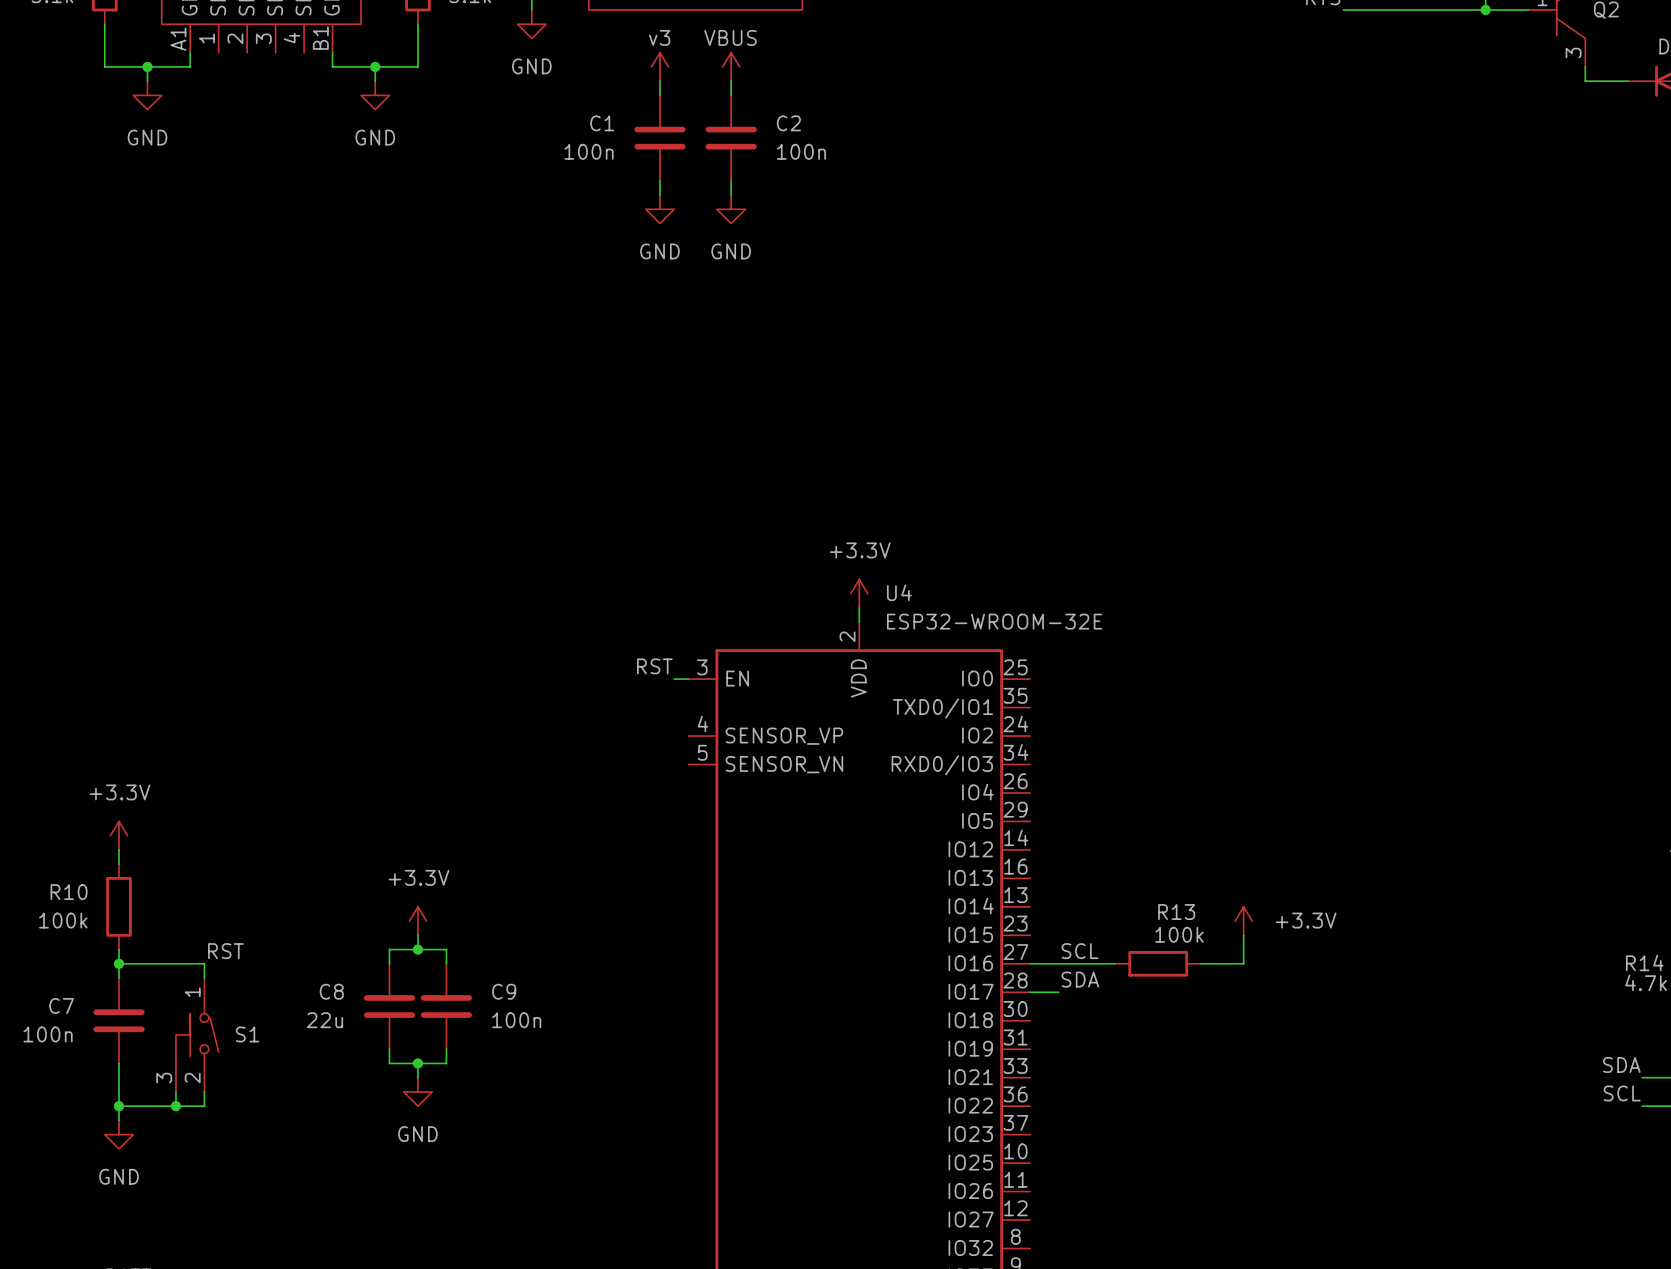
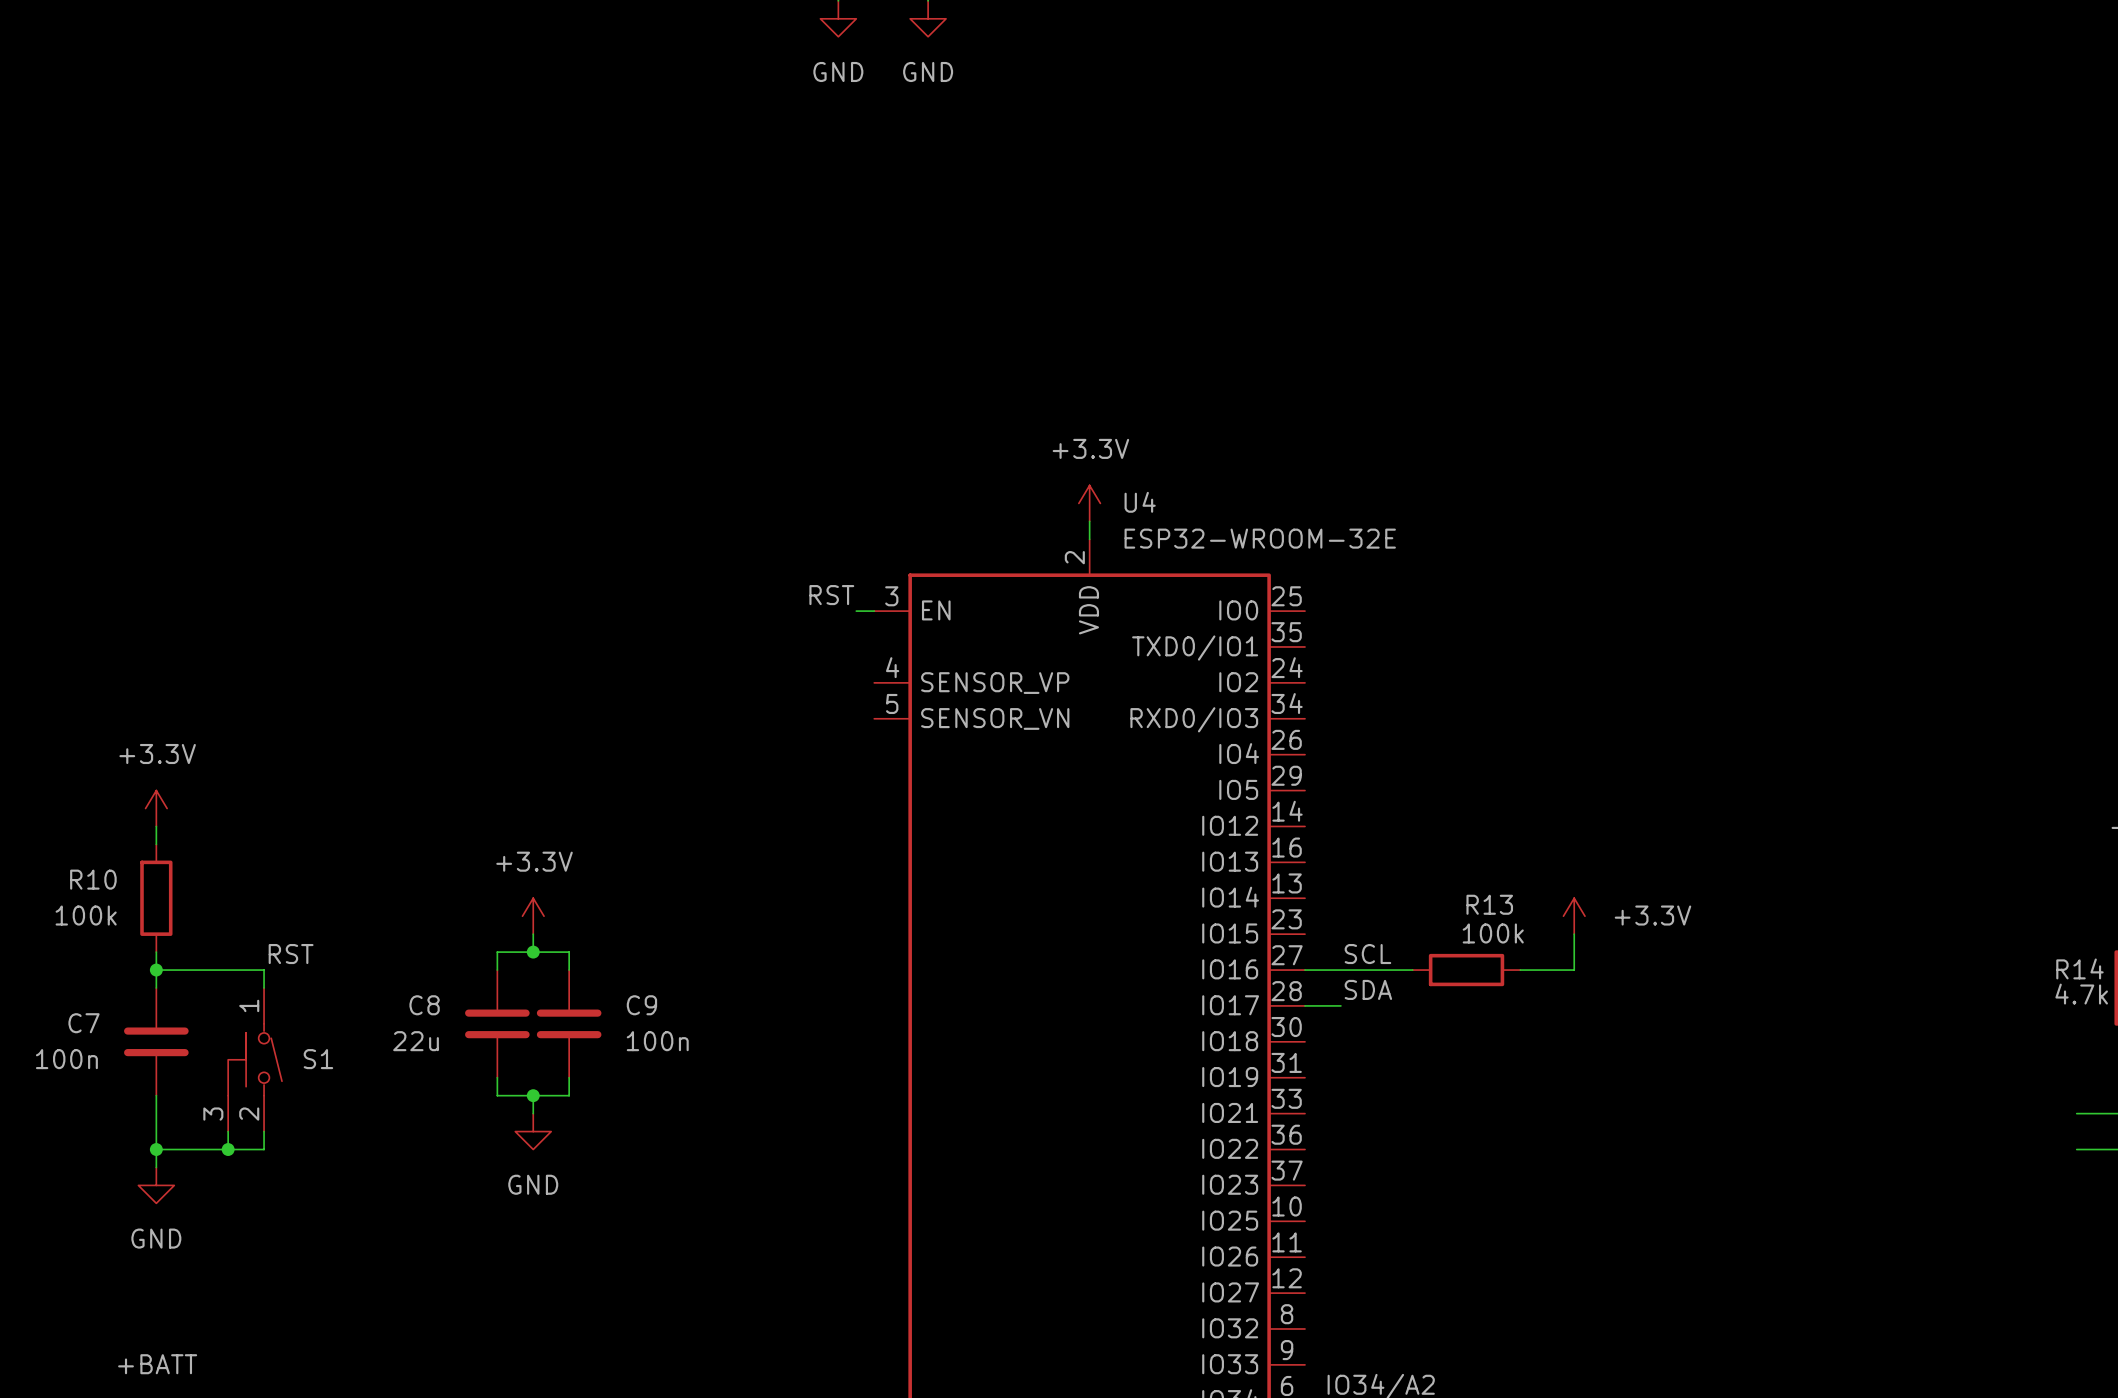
label: SDA (1621, 1064) -> none
label: SCL (1622, 1093) -> none

